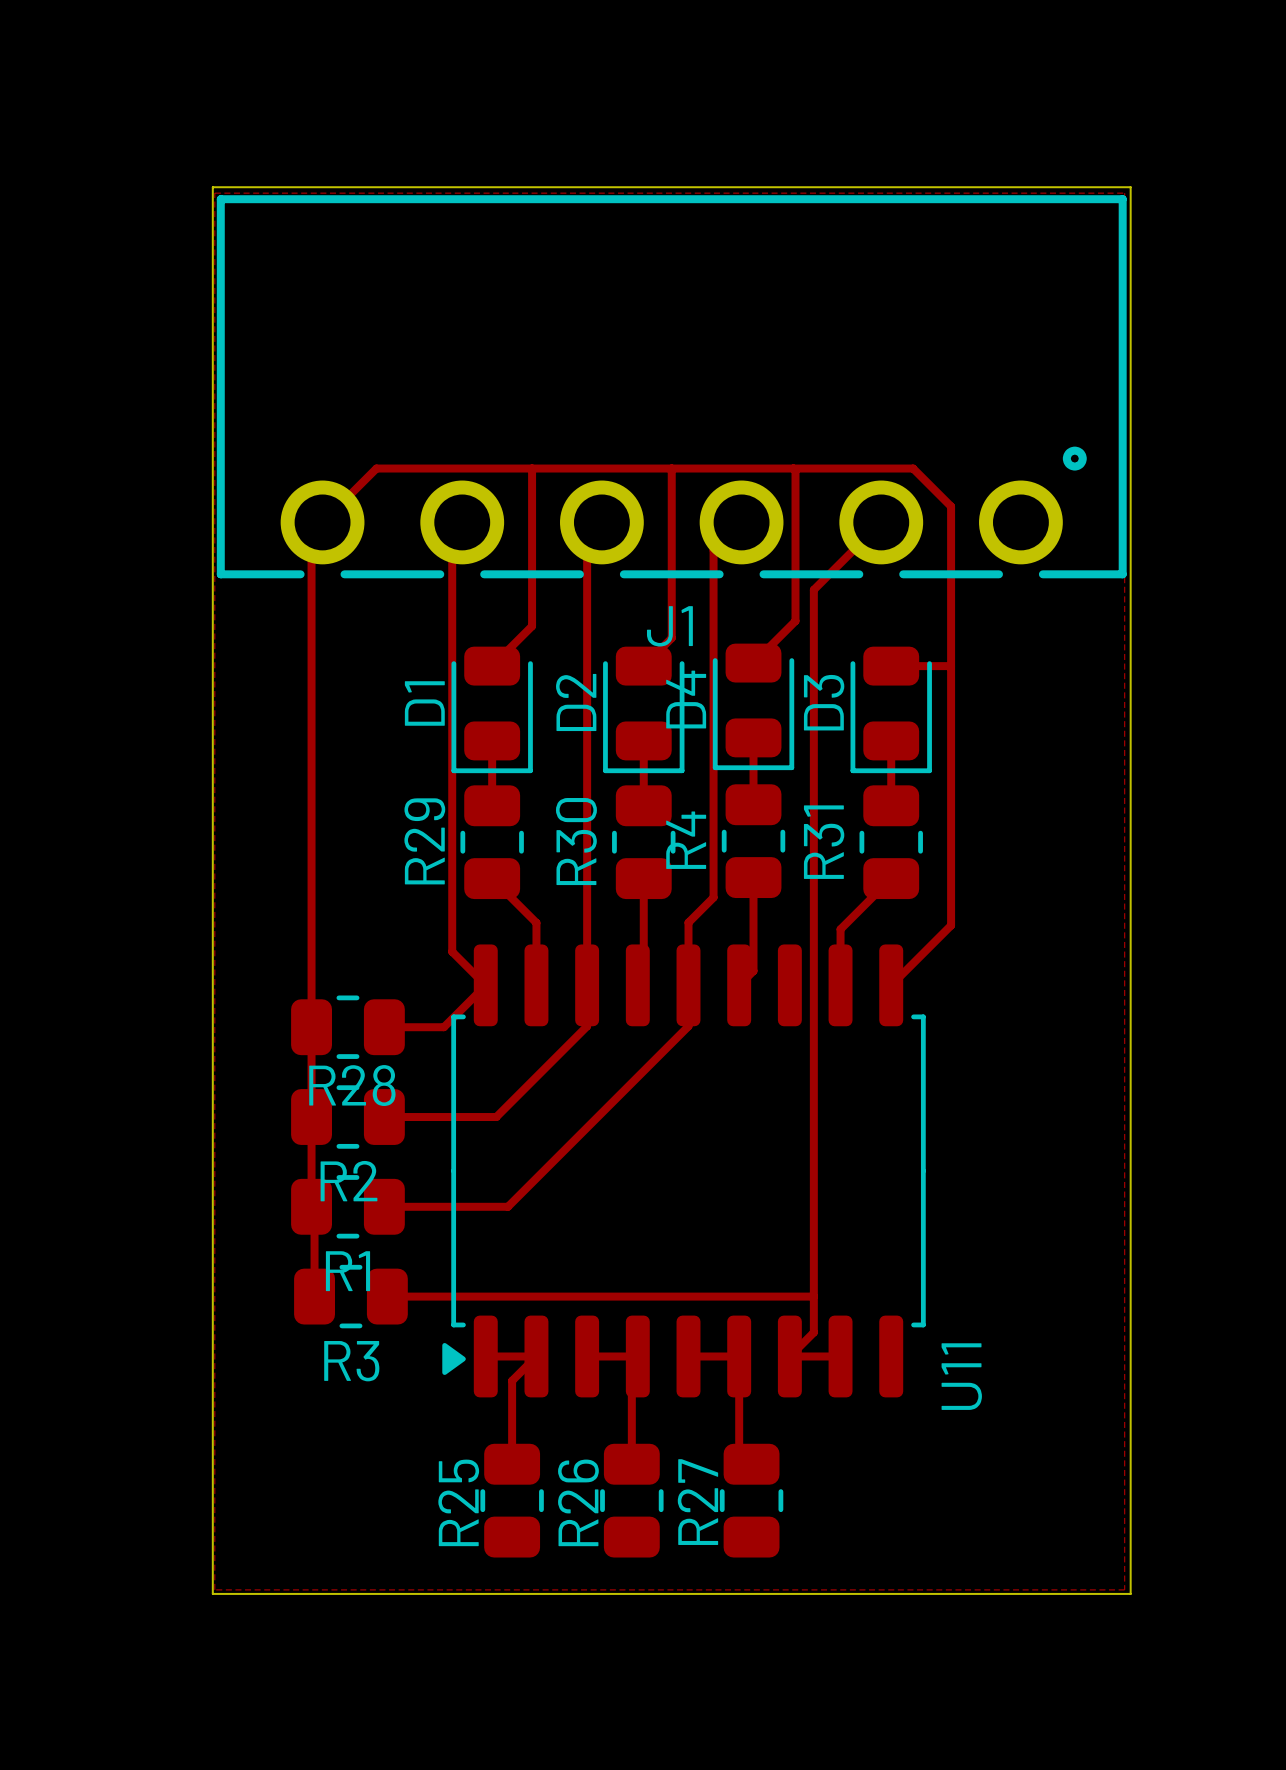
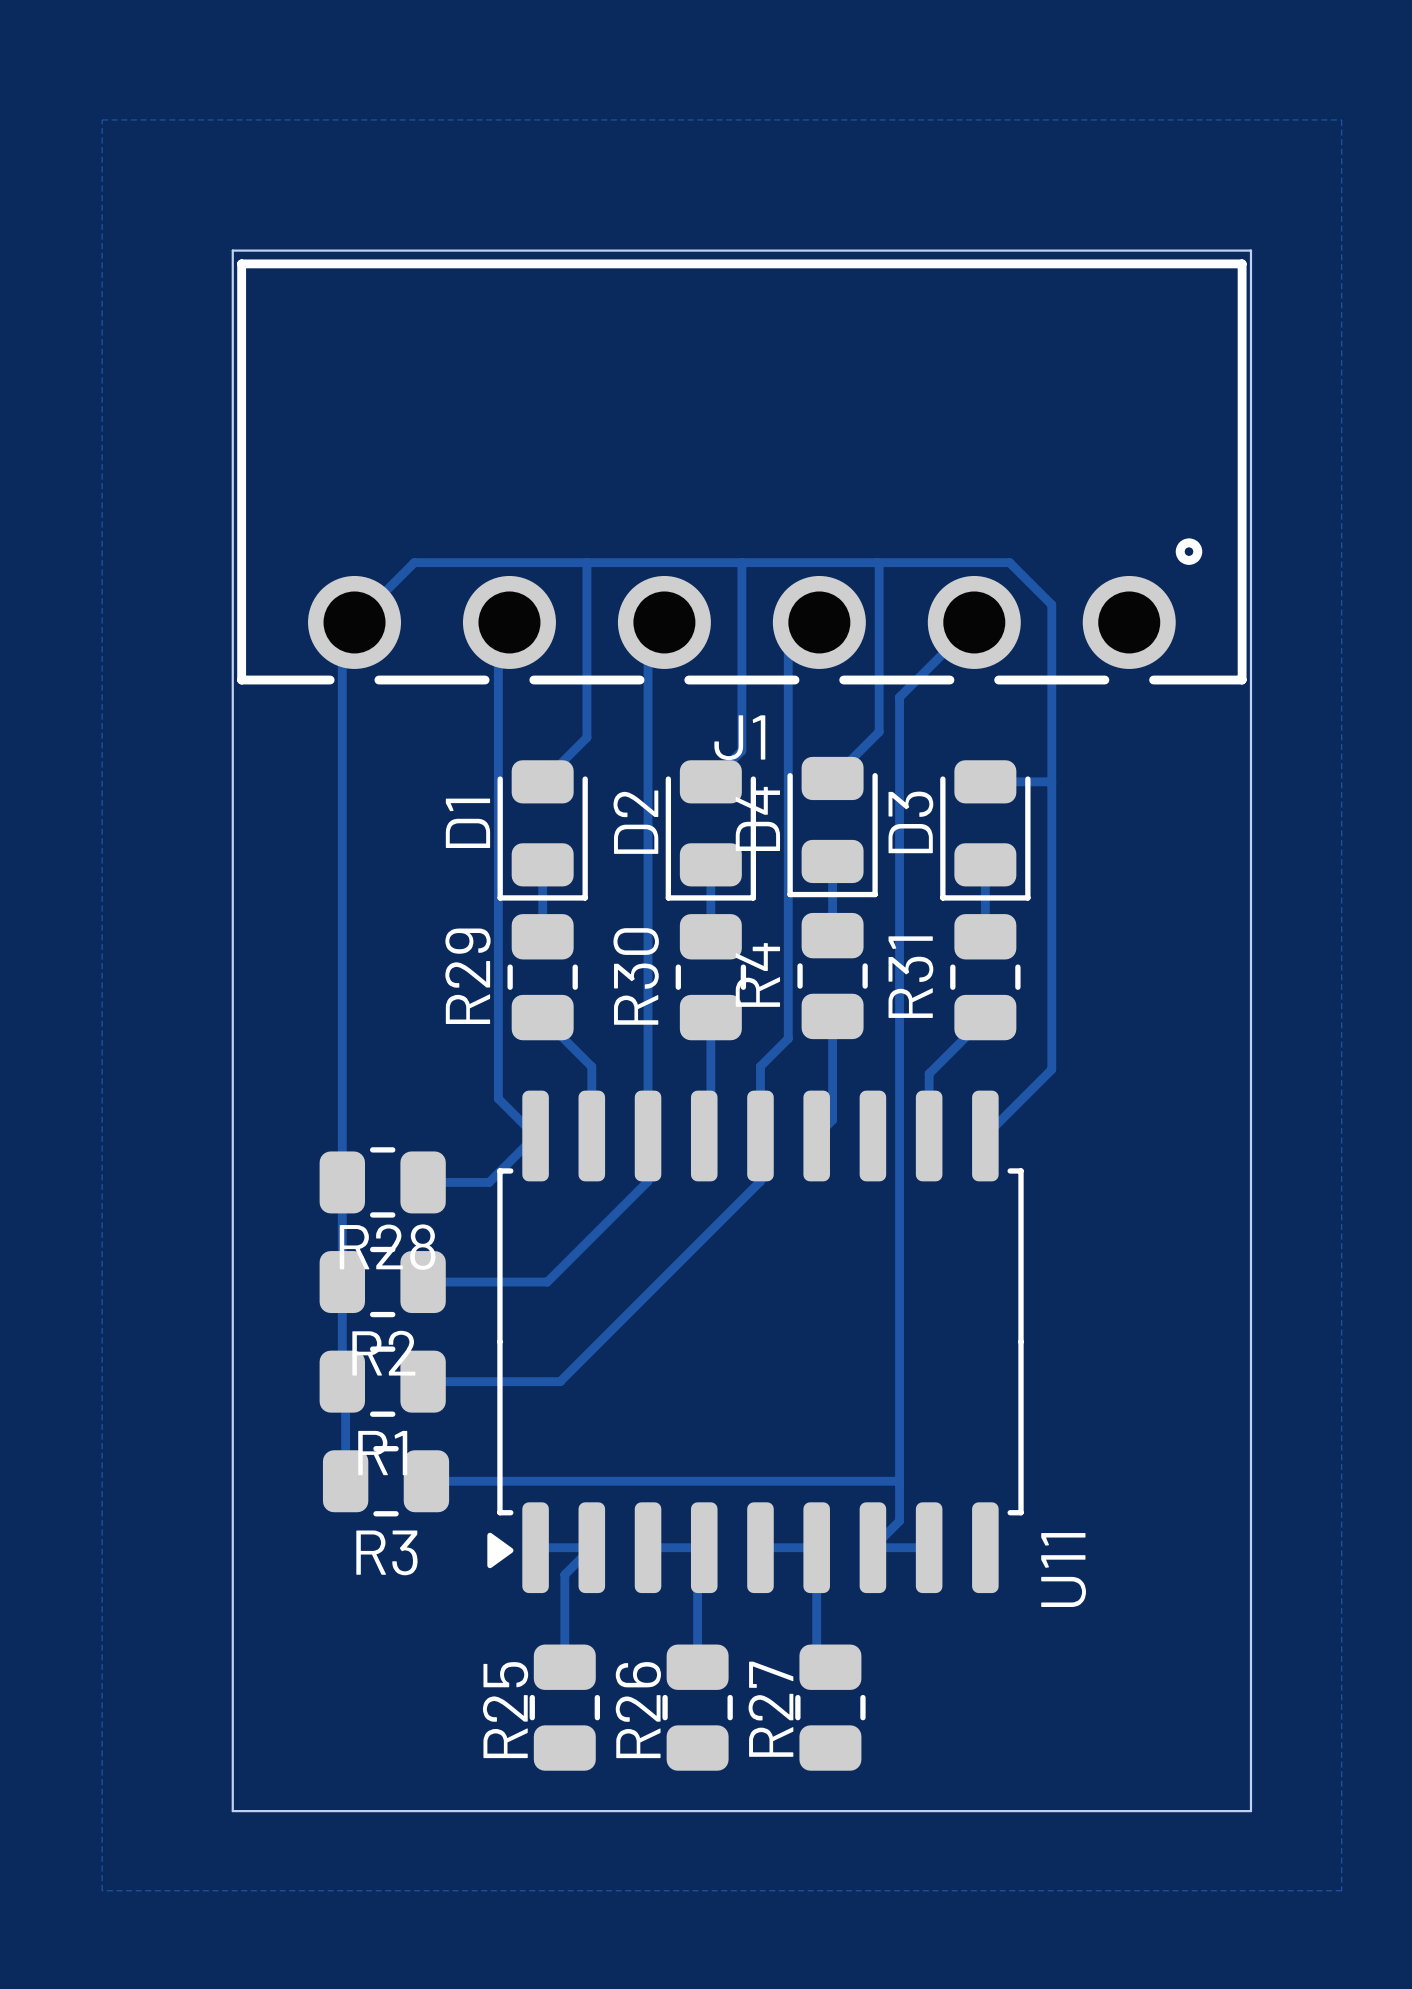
zone outline: (214, 193) (1124, 193) (1124, 1589) (214, 1589) (214, 193) -> (102, 119) (102, 1890) (1341, 1890) (1341, 119) (102, 119)

